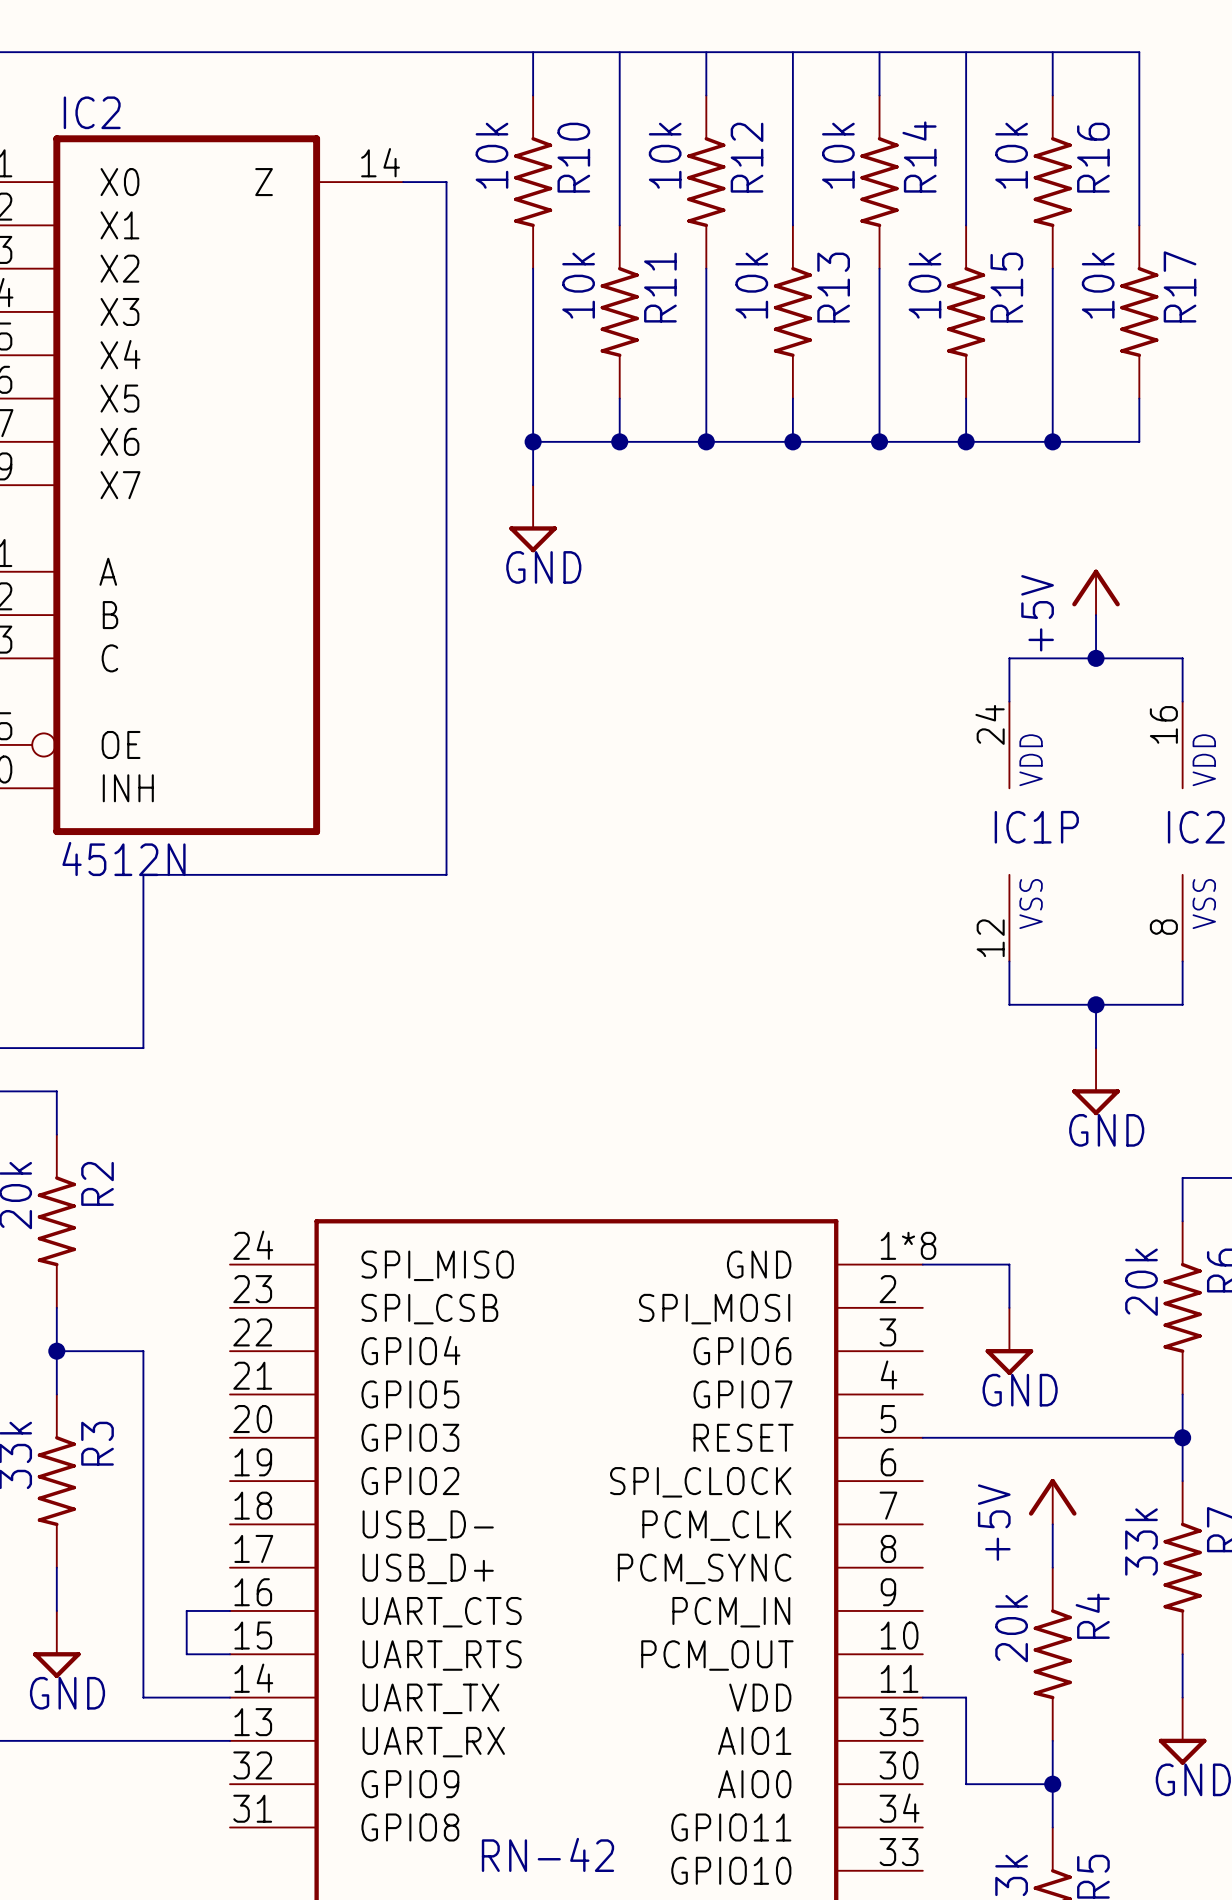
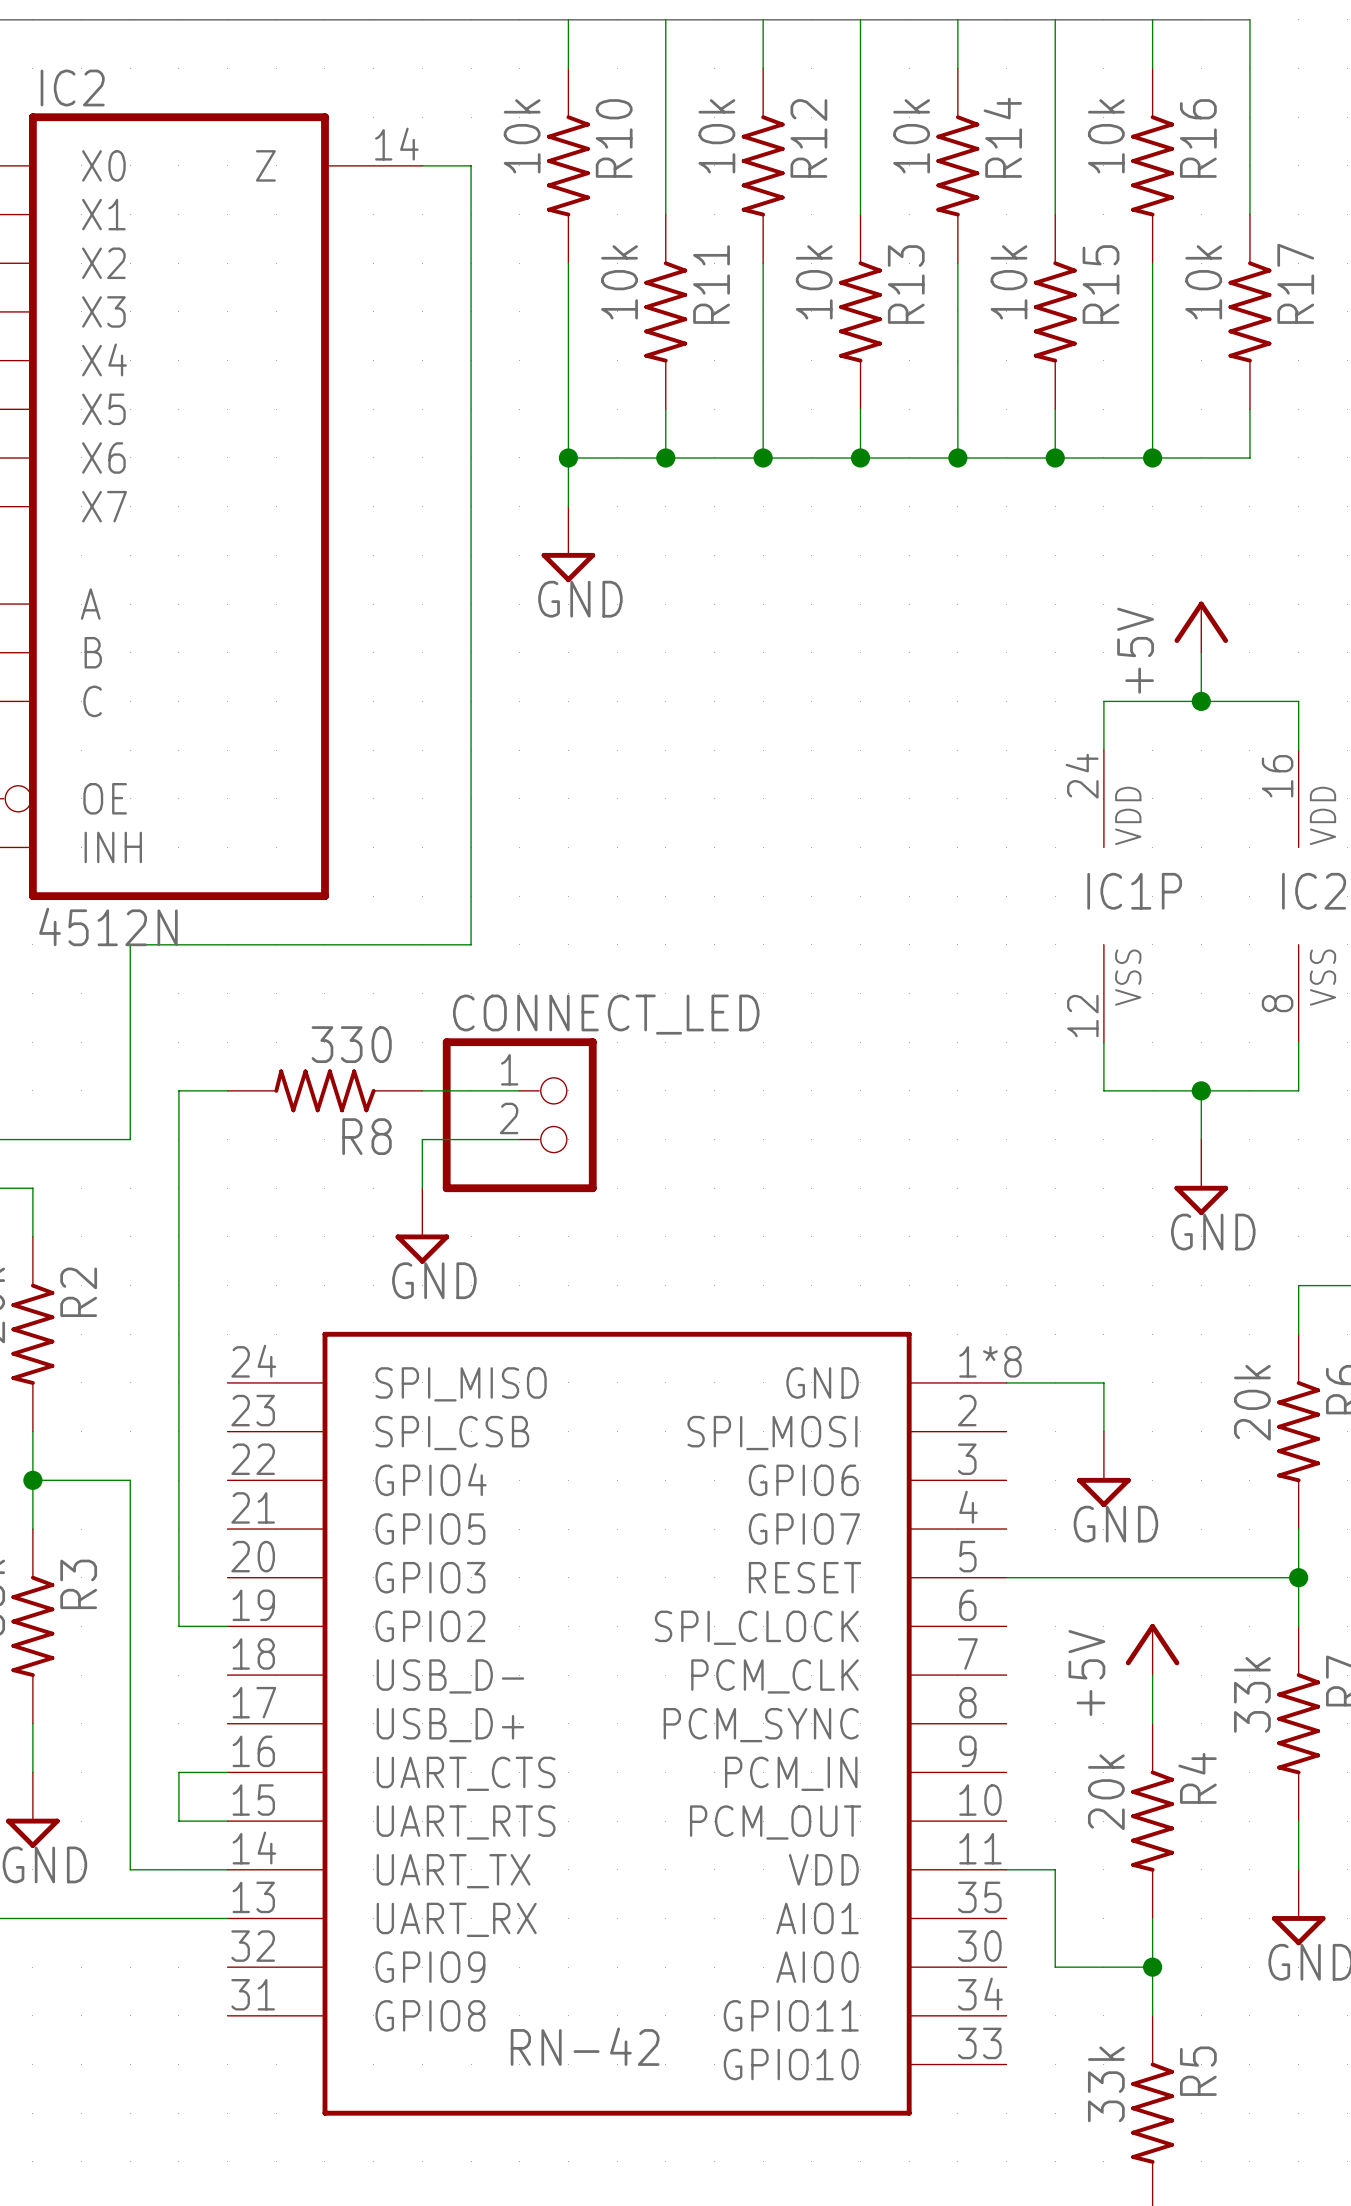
wire: none -> (227, 1090) (178, 1090) (178, 1626) (227, 1626)
R8: none -> 330 (324, 1090)
wire: none -> (422, 1090) (519, 1090)
CONNECT_LED: none -> (519, 1115)
wire: none -> (519, 1139) (422, 1139) (422, 1188)
power symbol: none -> GND (422, 1225)

